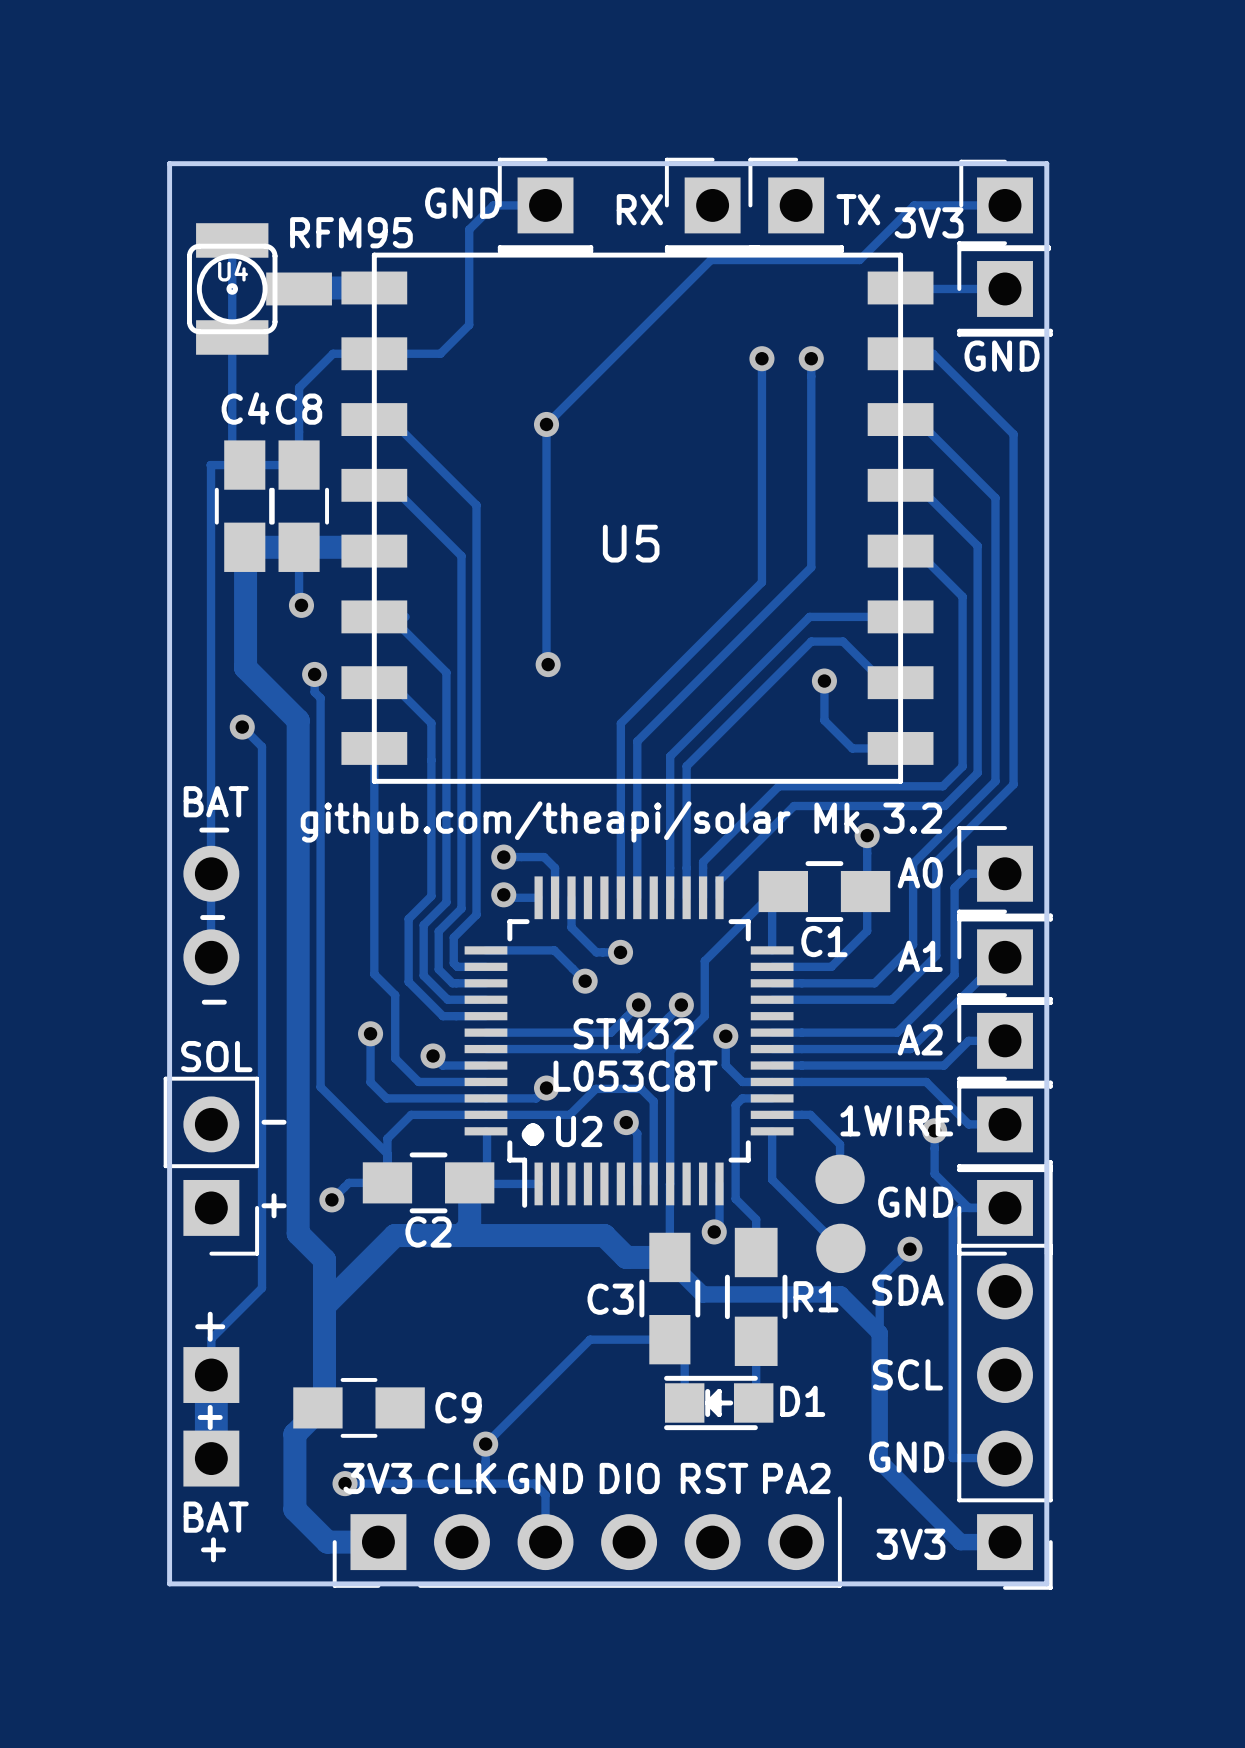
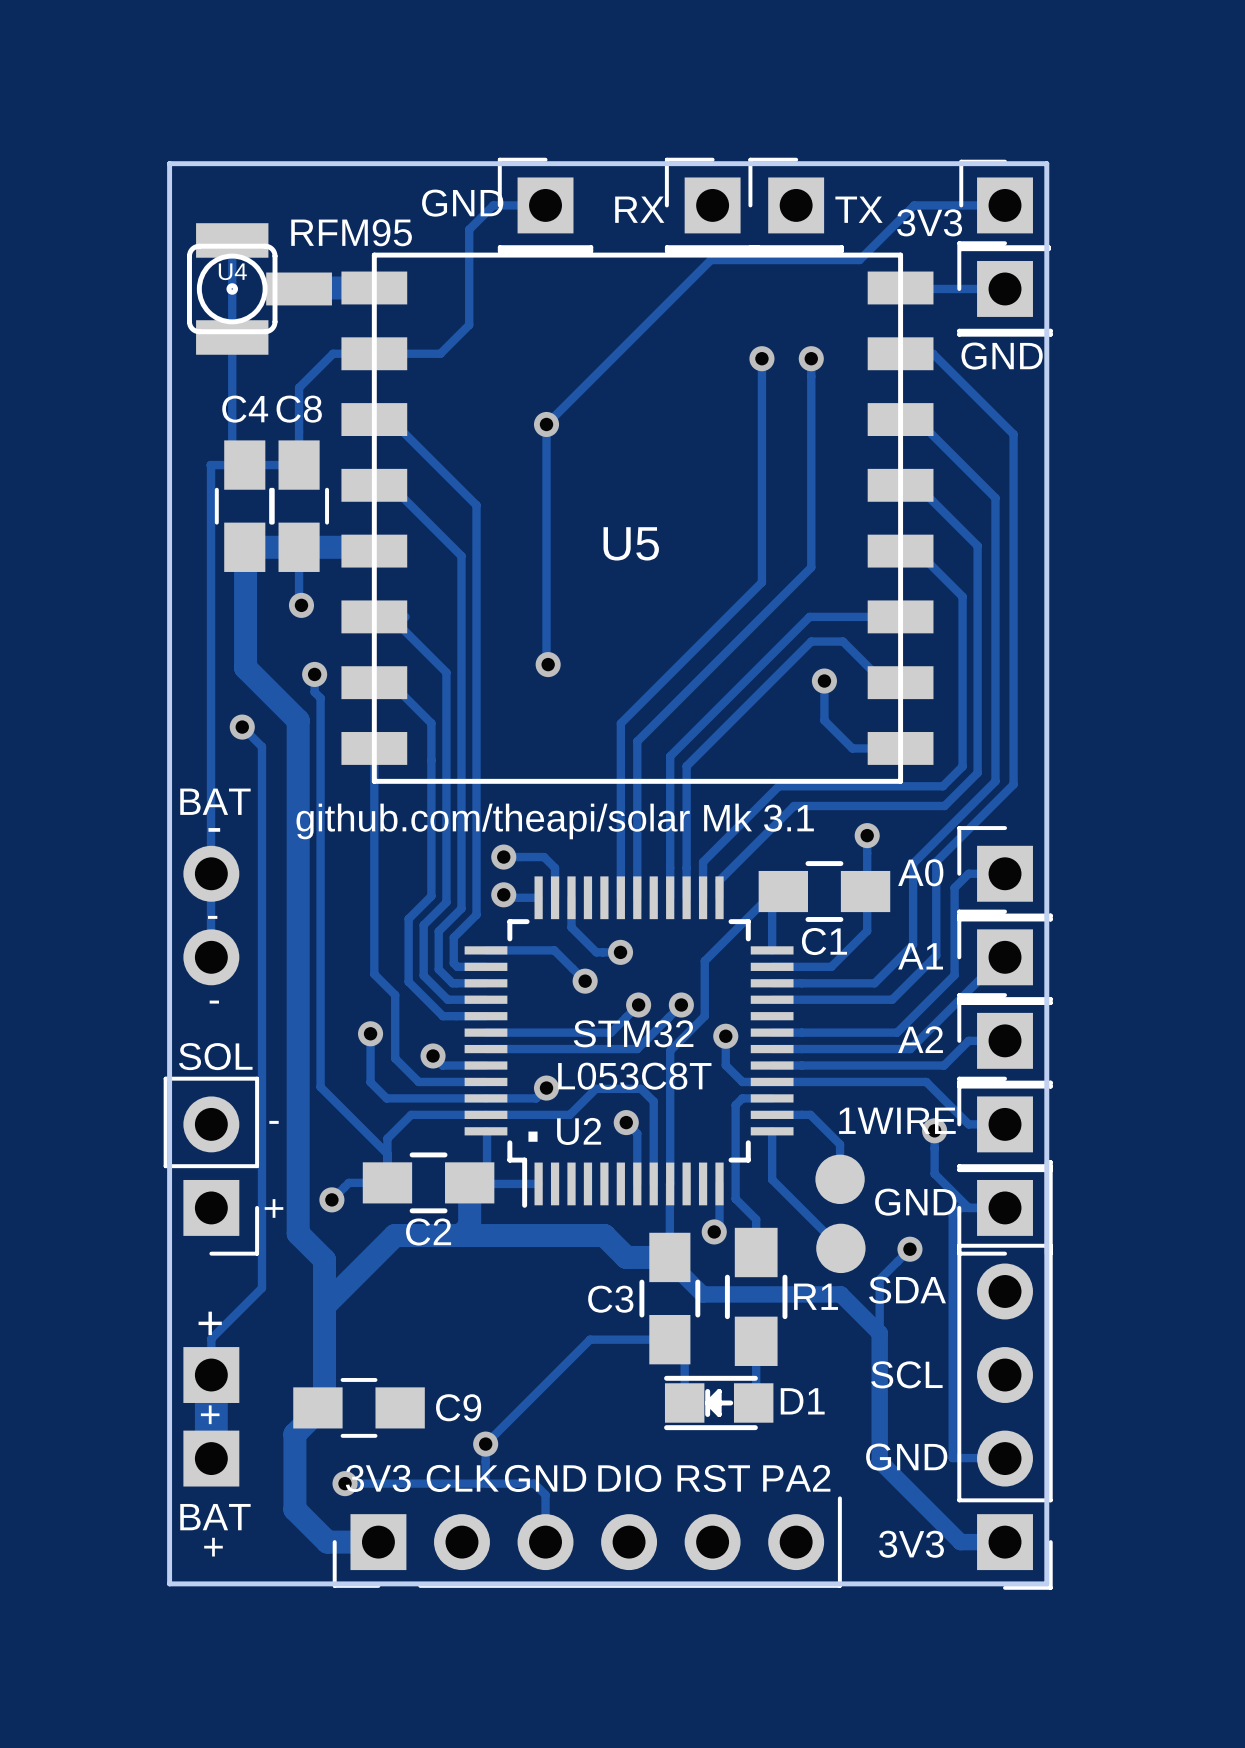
text: github.com/theapi/solar Mk 3.2 (621, 821) -> github.com/theapi/solar Mk 3.1 (555, 821)

